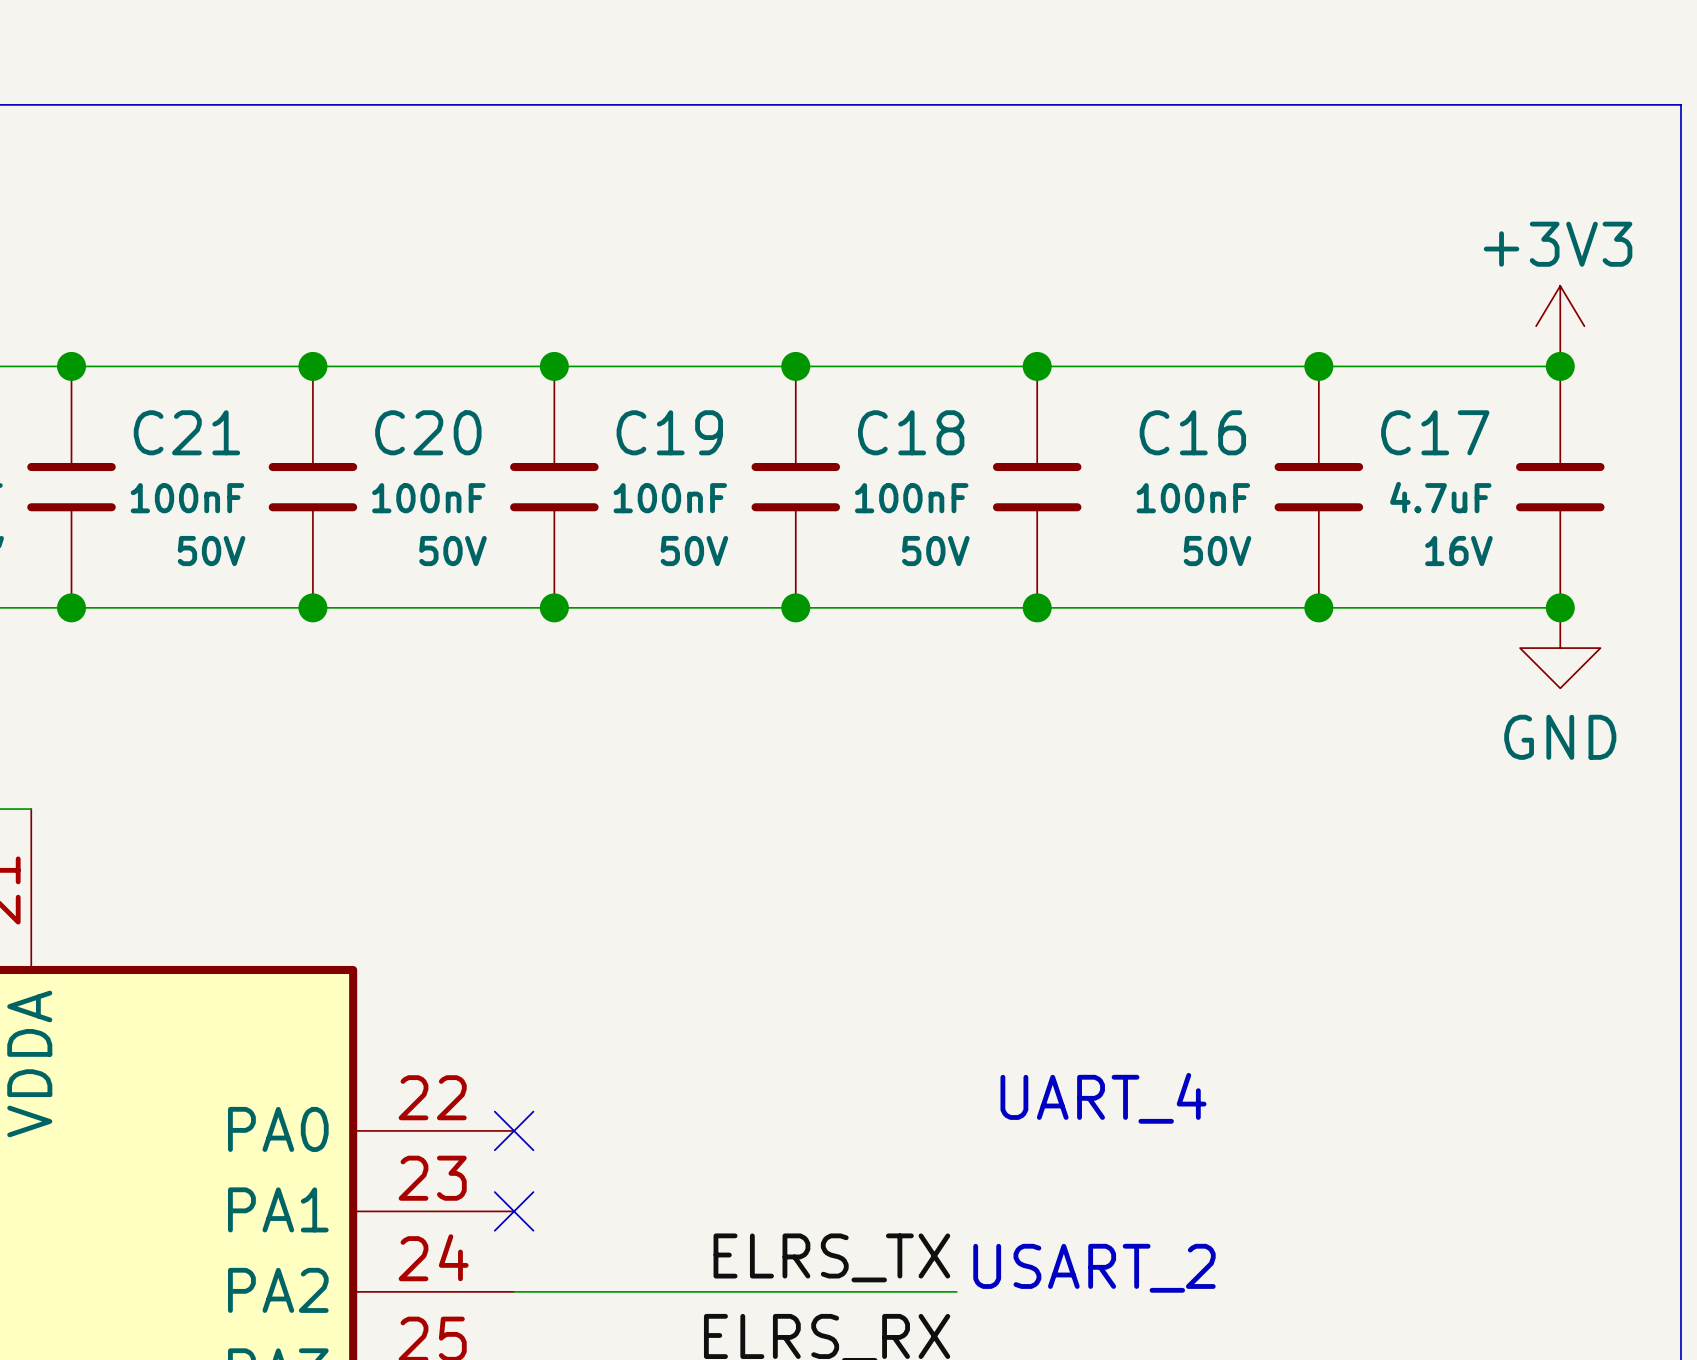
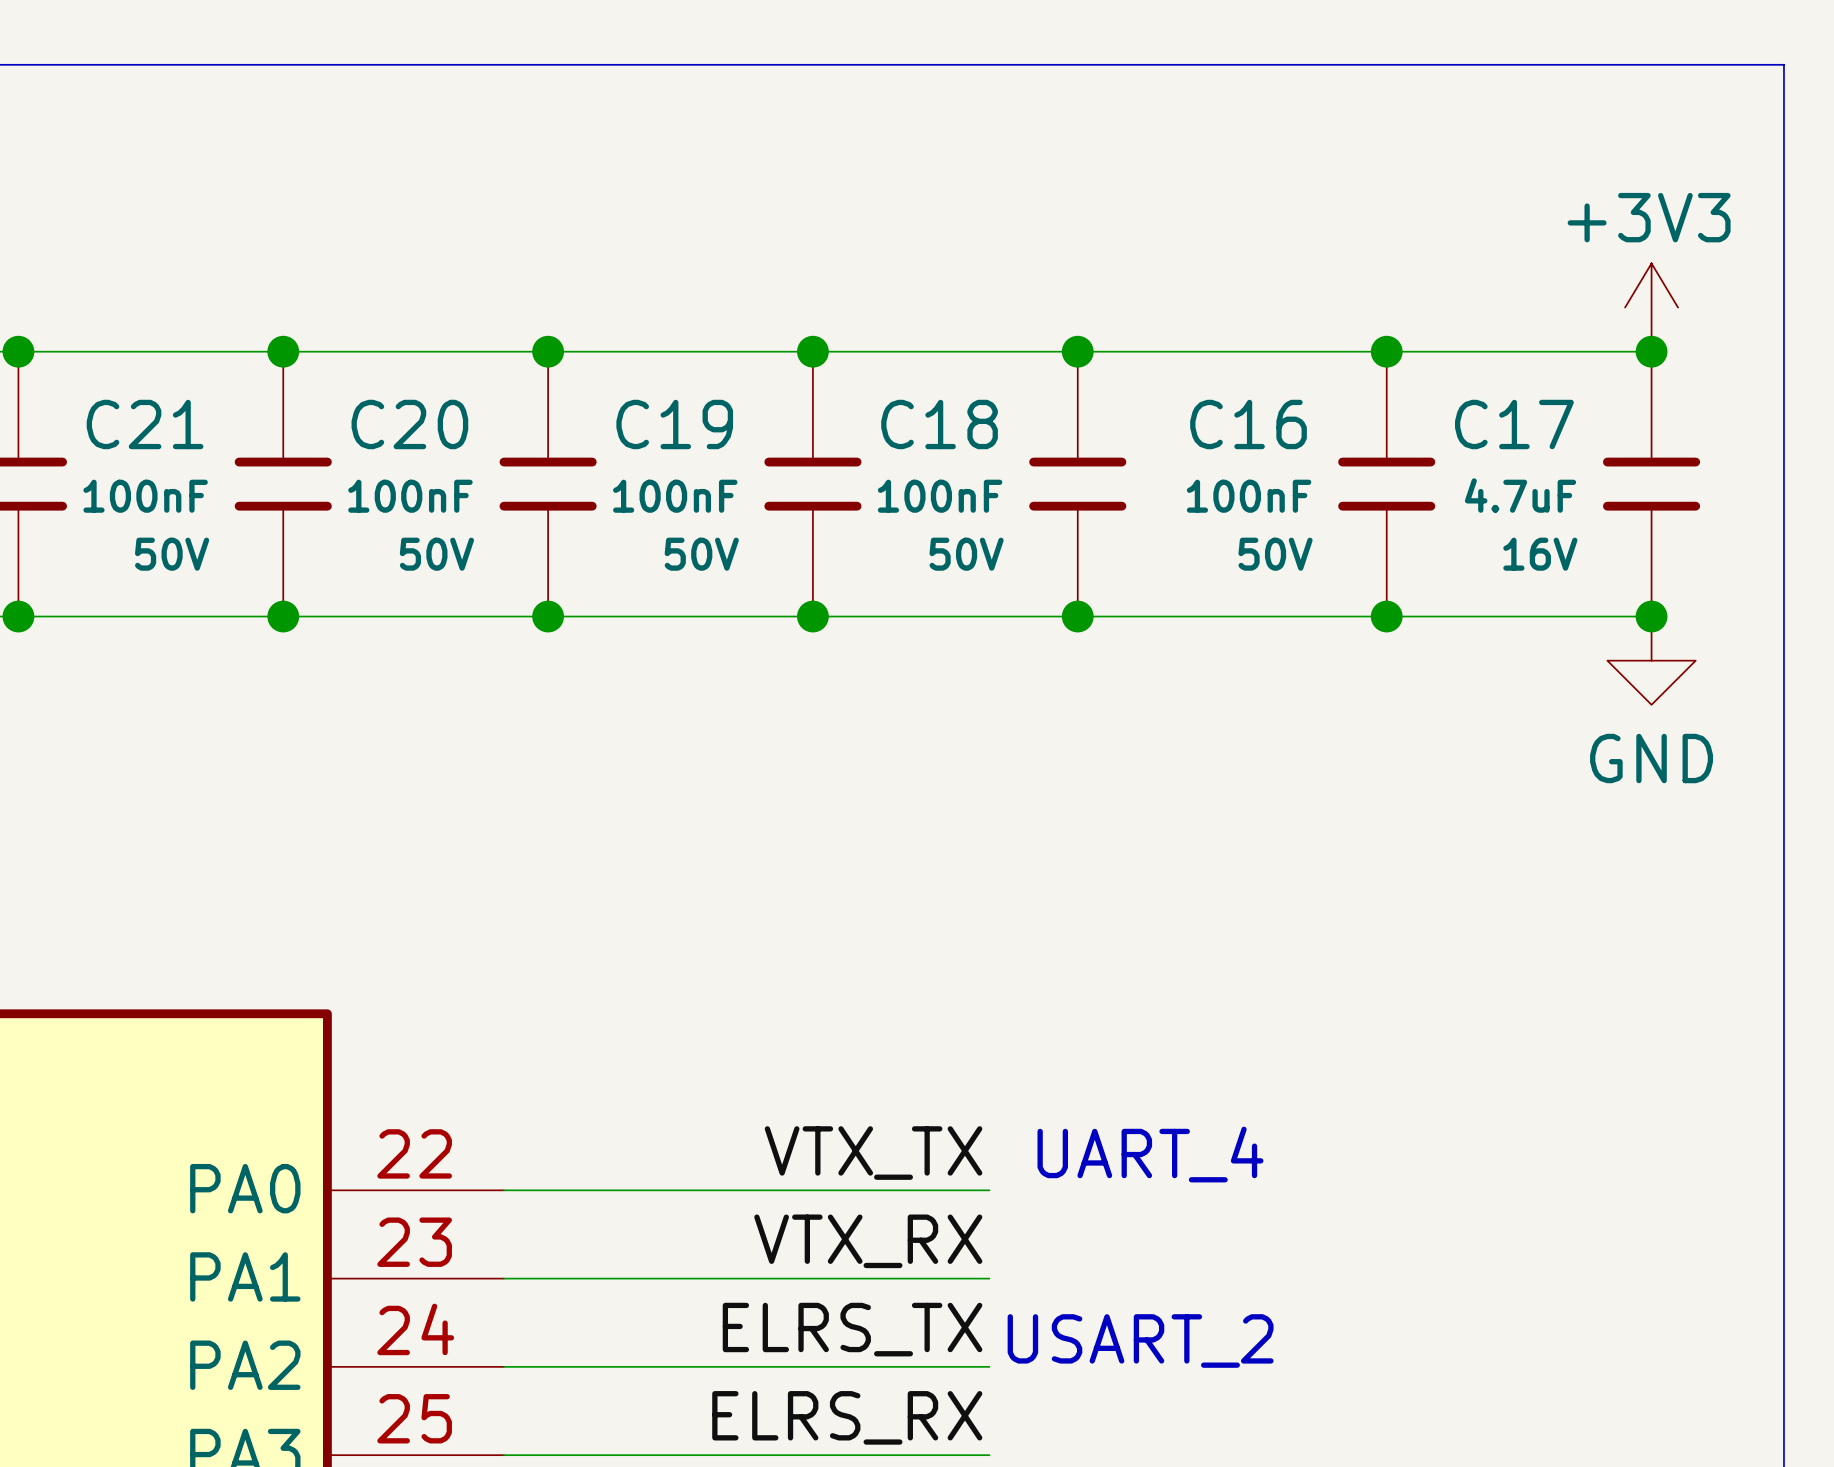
label: none -> VTX_TX (873, 1153)
wire: none -> (503, 1190) (989, 1190)
no-connect mark: (514, 1130) -> none
label: none -> VTX_RX (868, 1241)
wire: none -> (503, 1278) (989, 1278)
no-connect mark: (514, 1211) -> none

